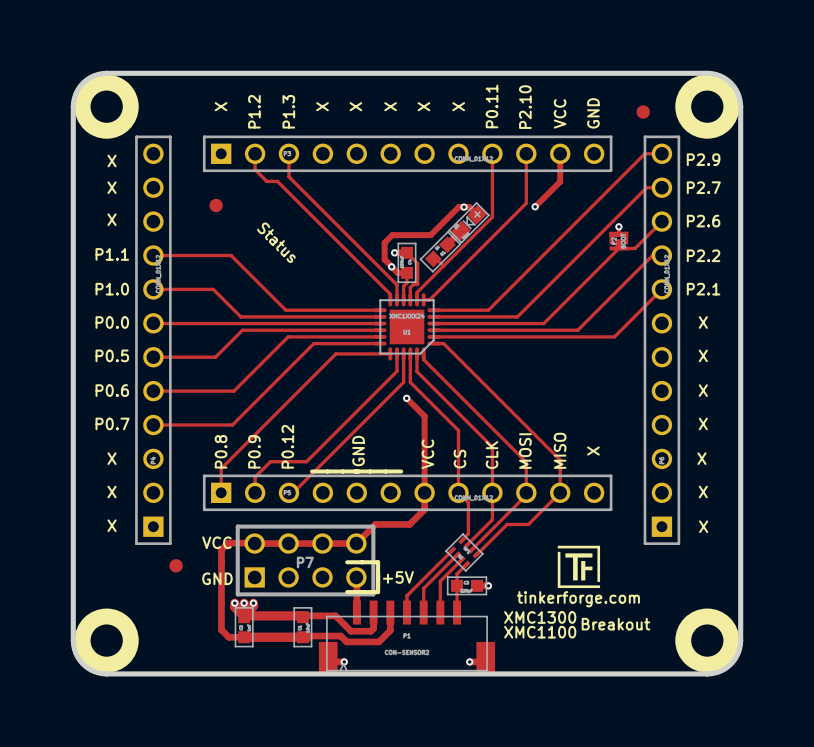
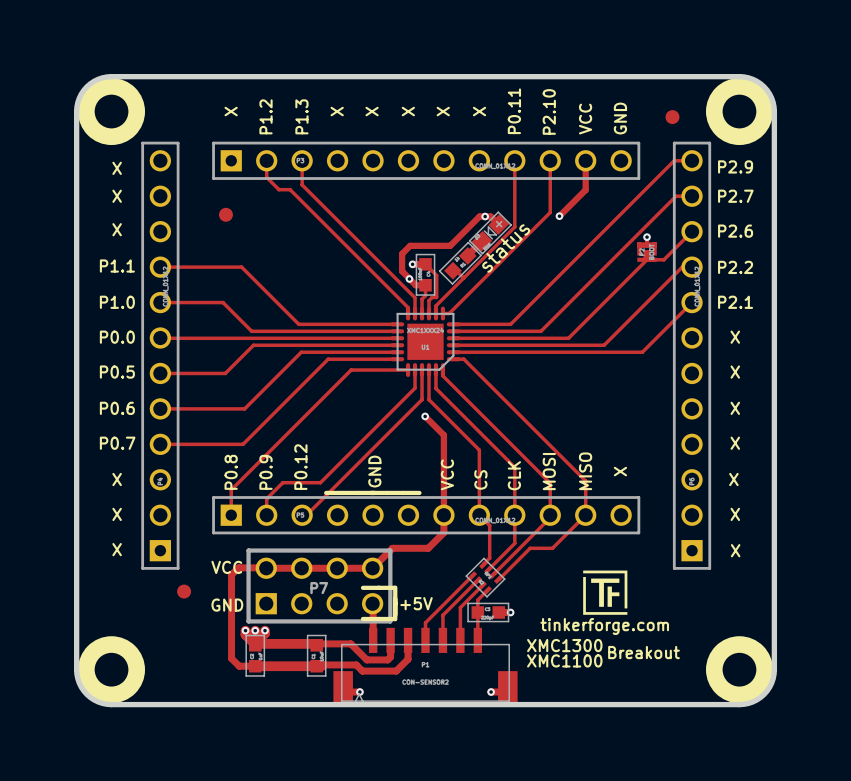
text: none -> status (506, 248)
text: Status (276, 242) -> none

